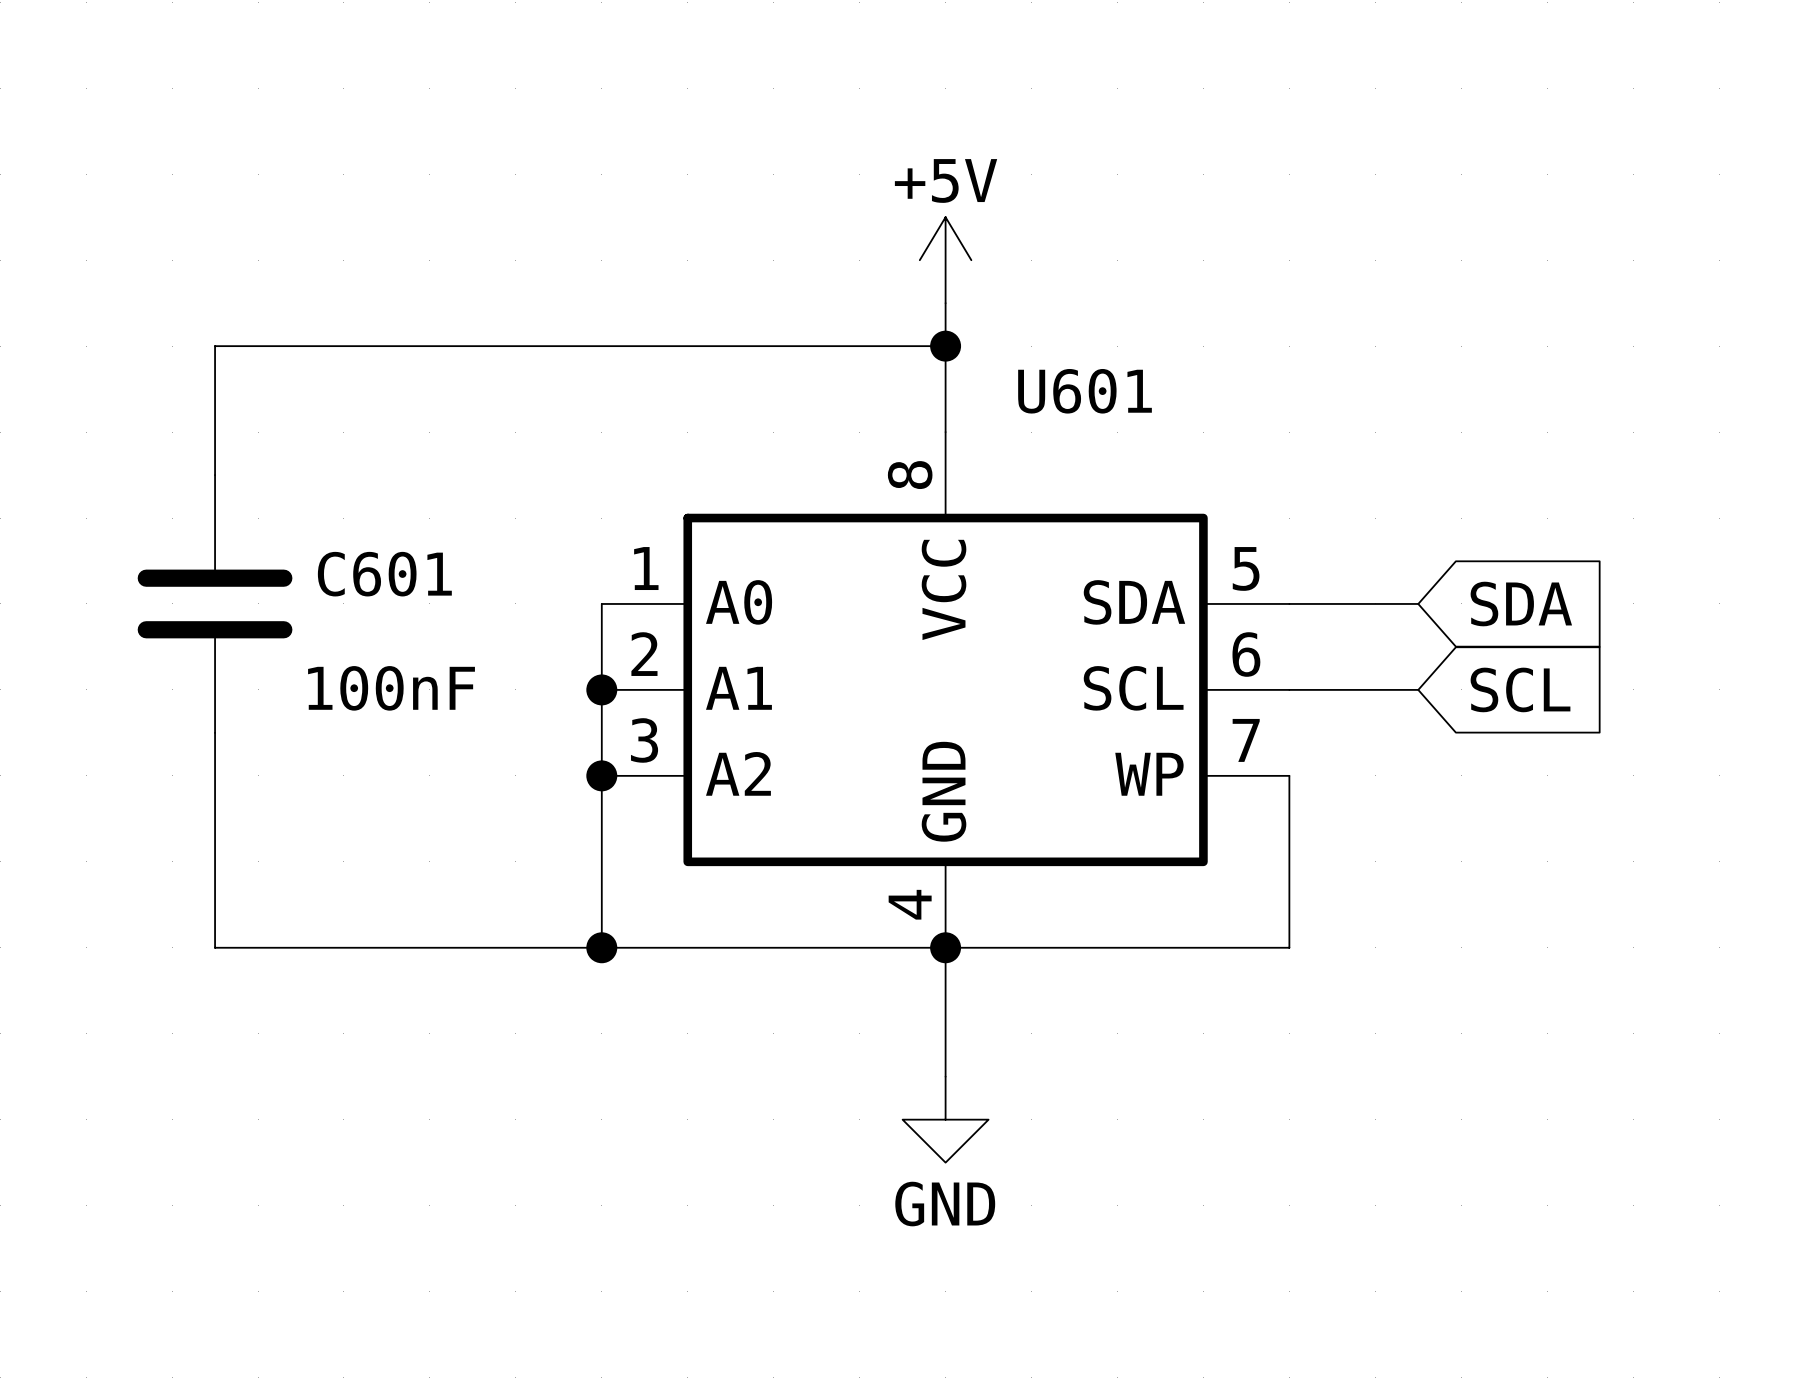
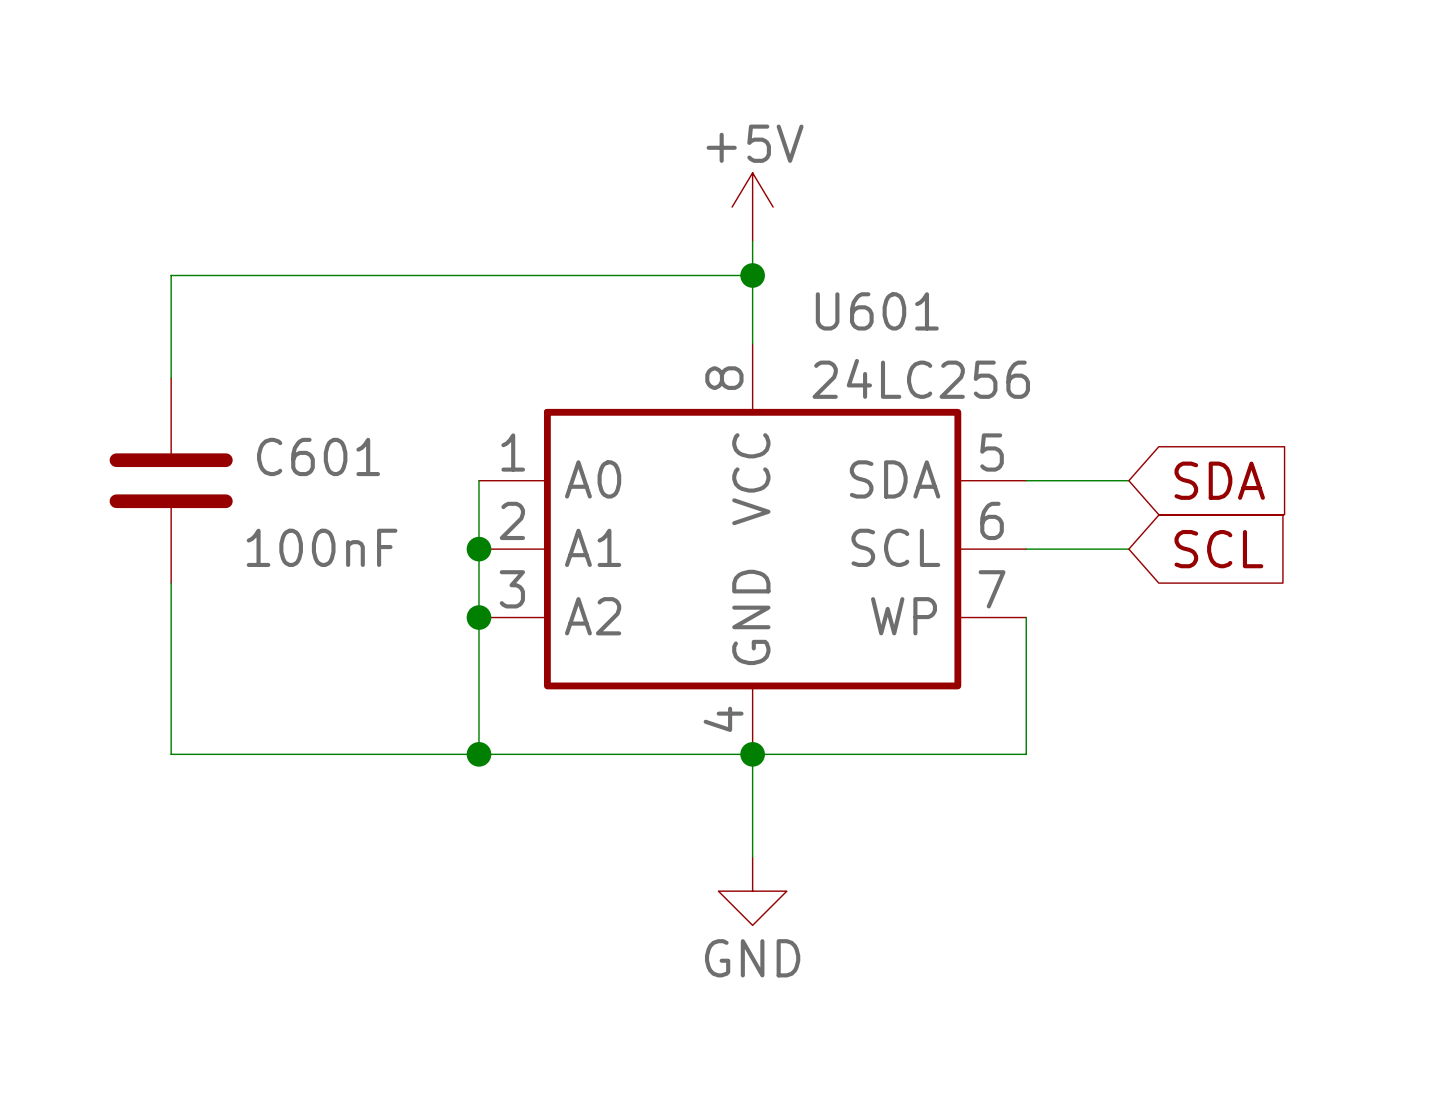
U601 value: none -> 24LC256 (921, 378)

